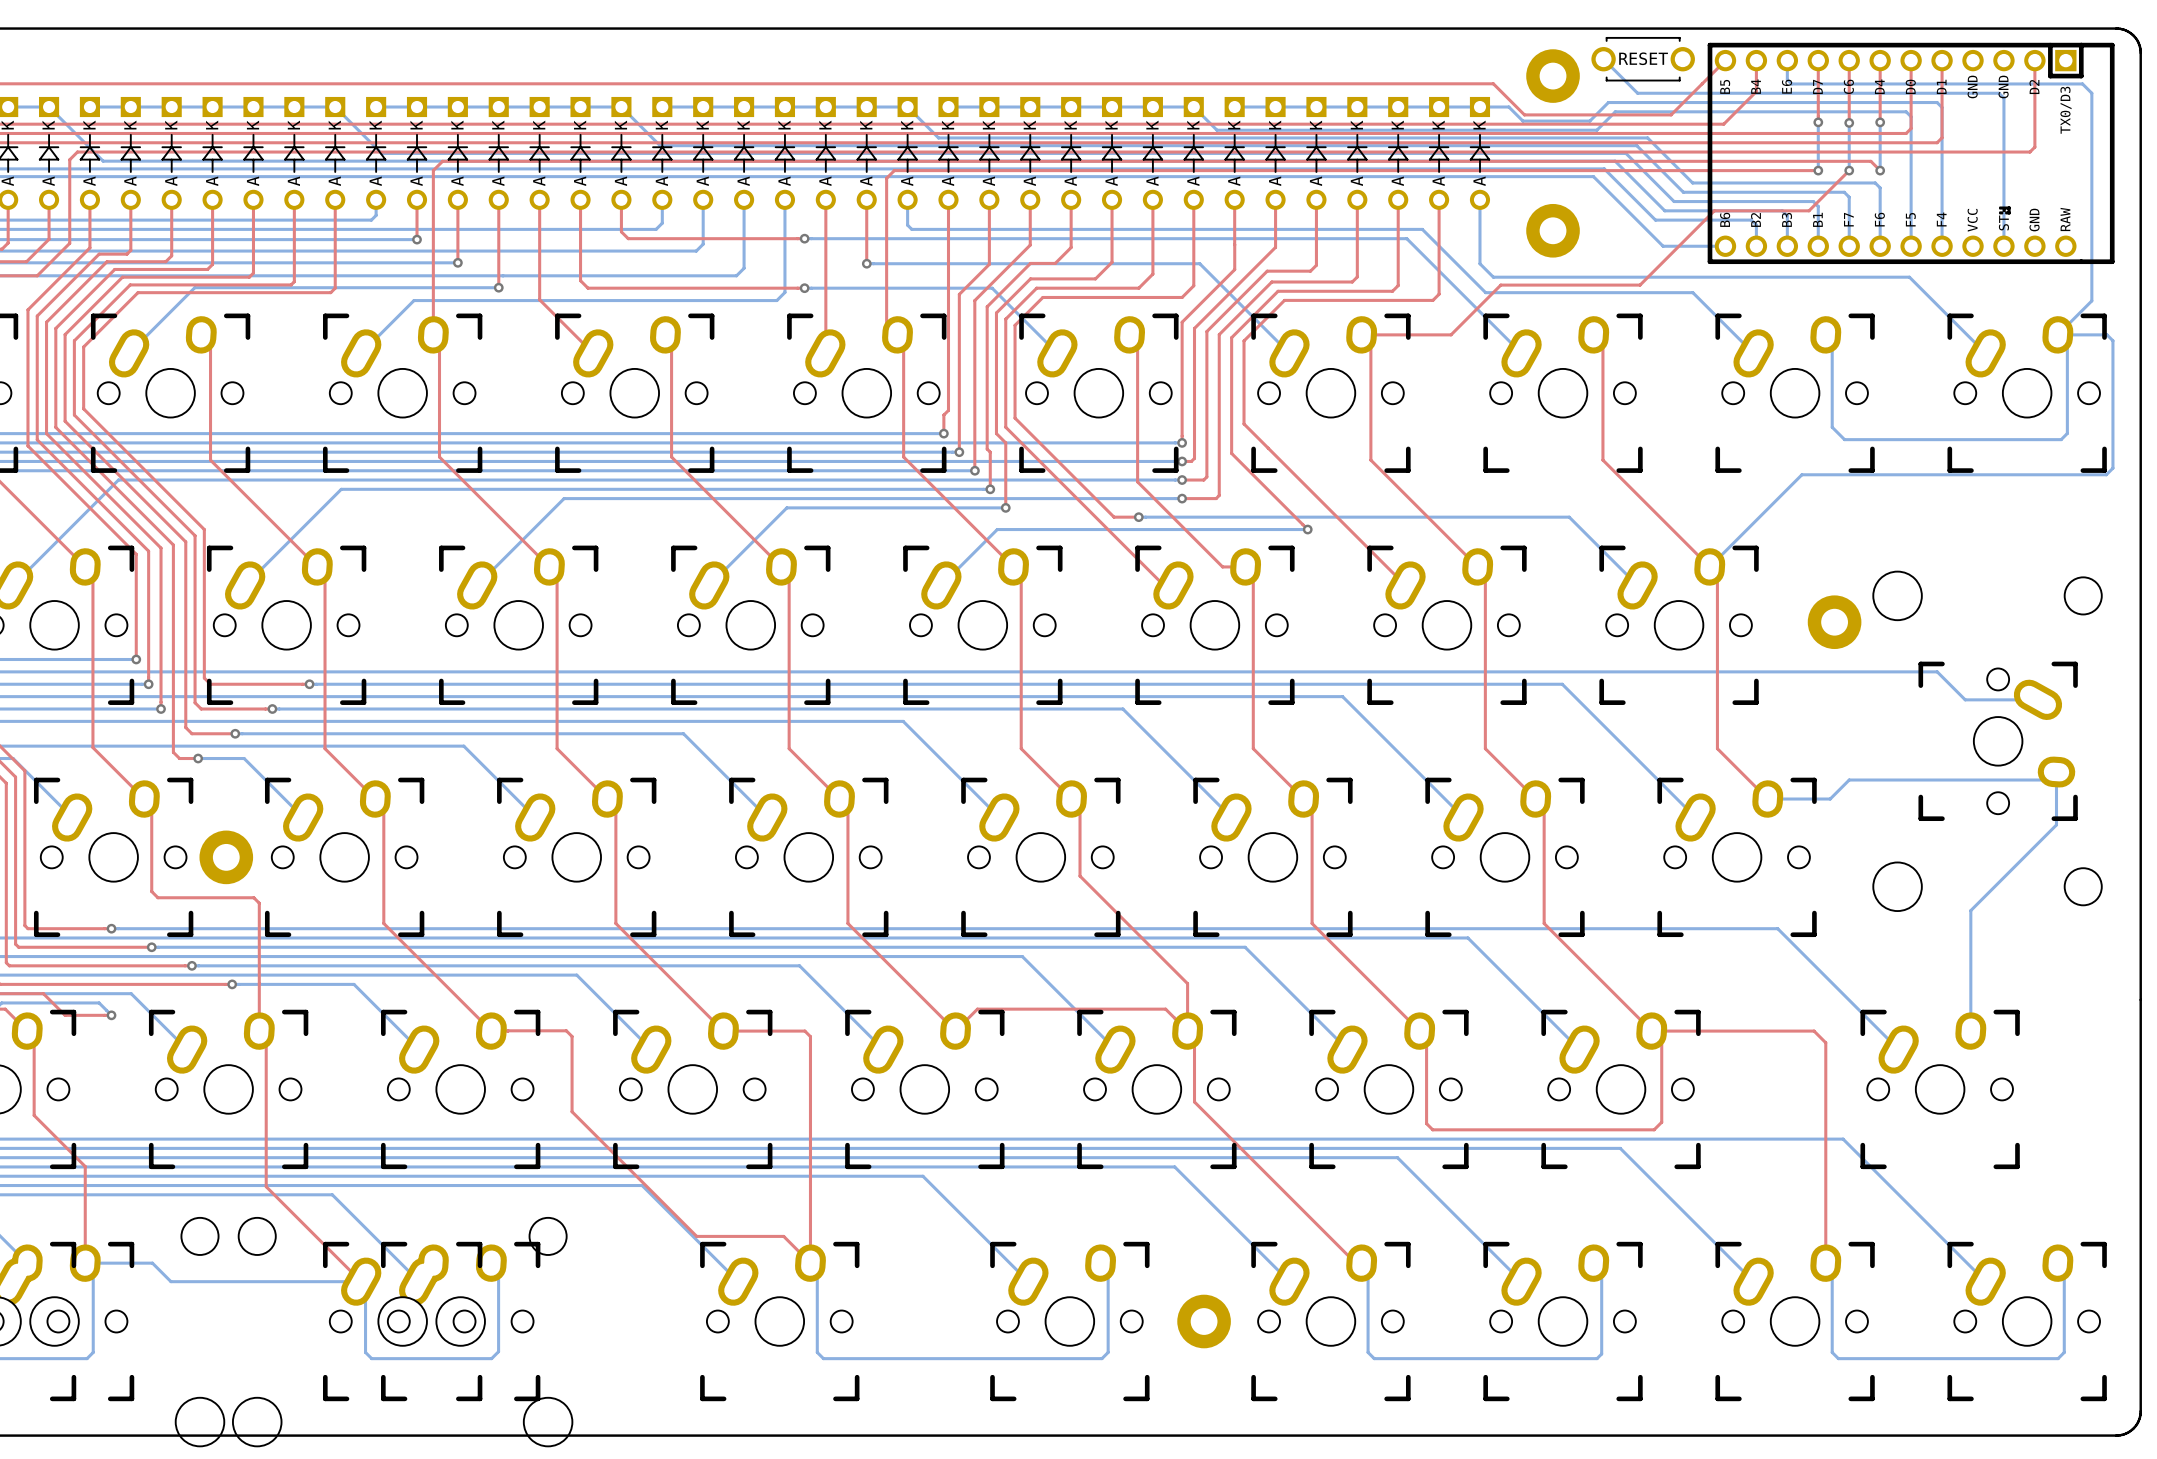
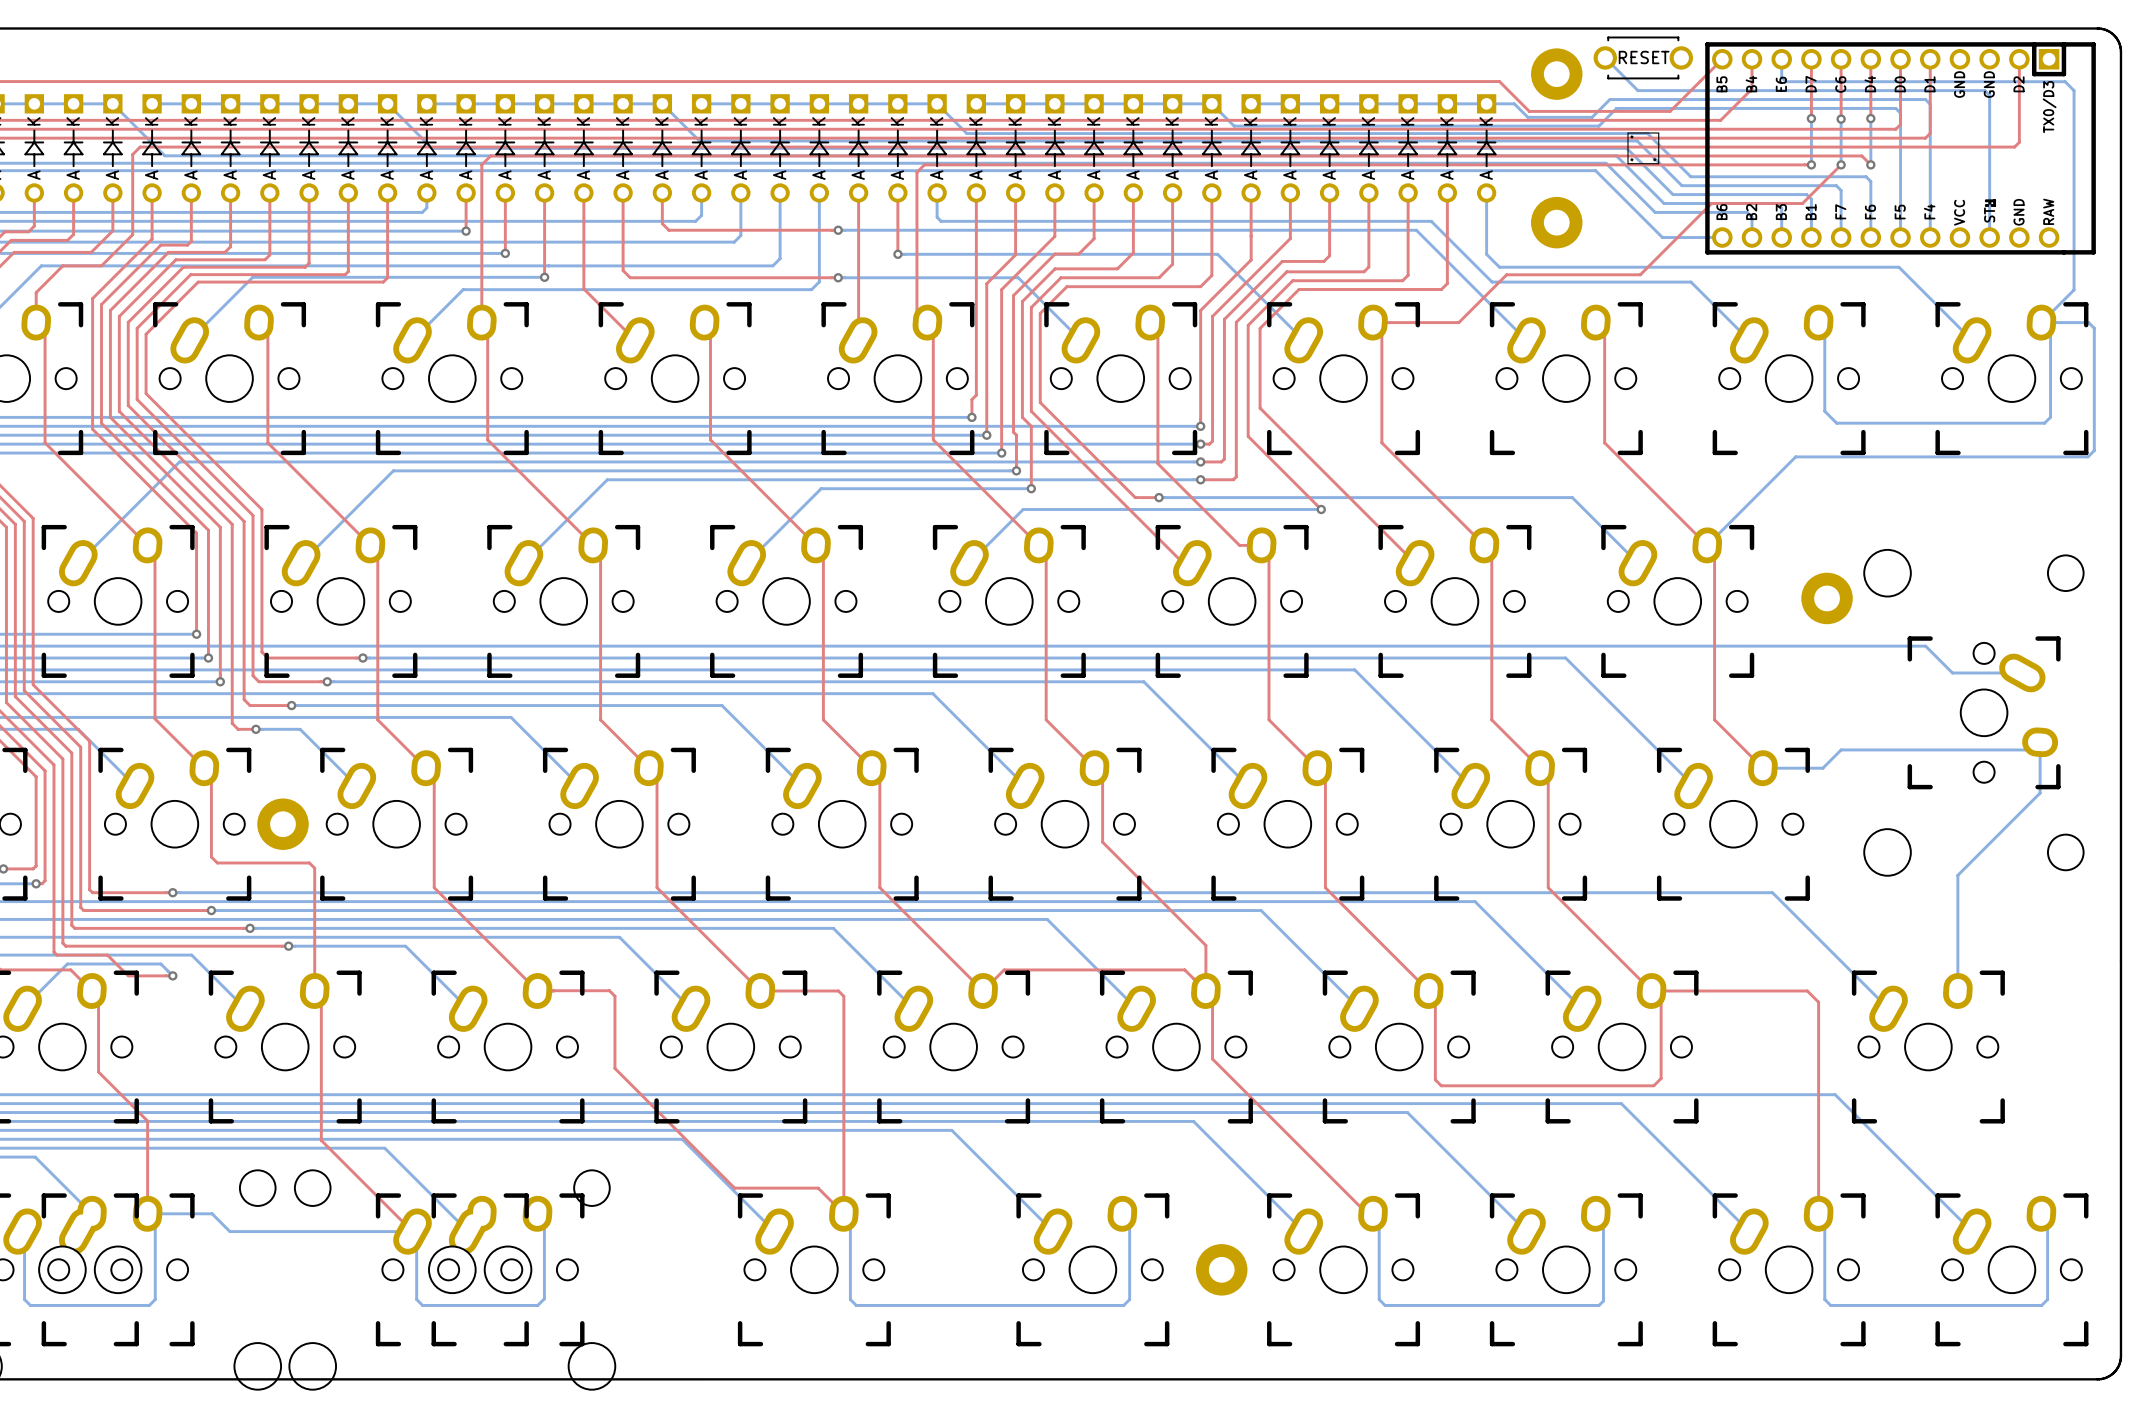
drawing: none -> [1627, 132, 1660, 165]

